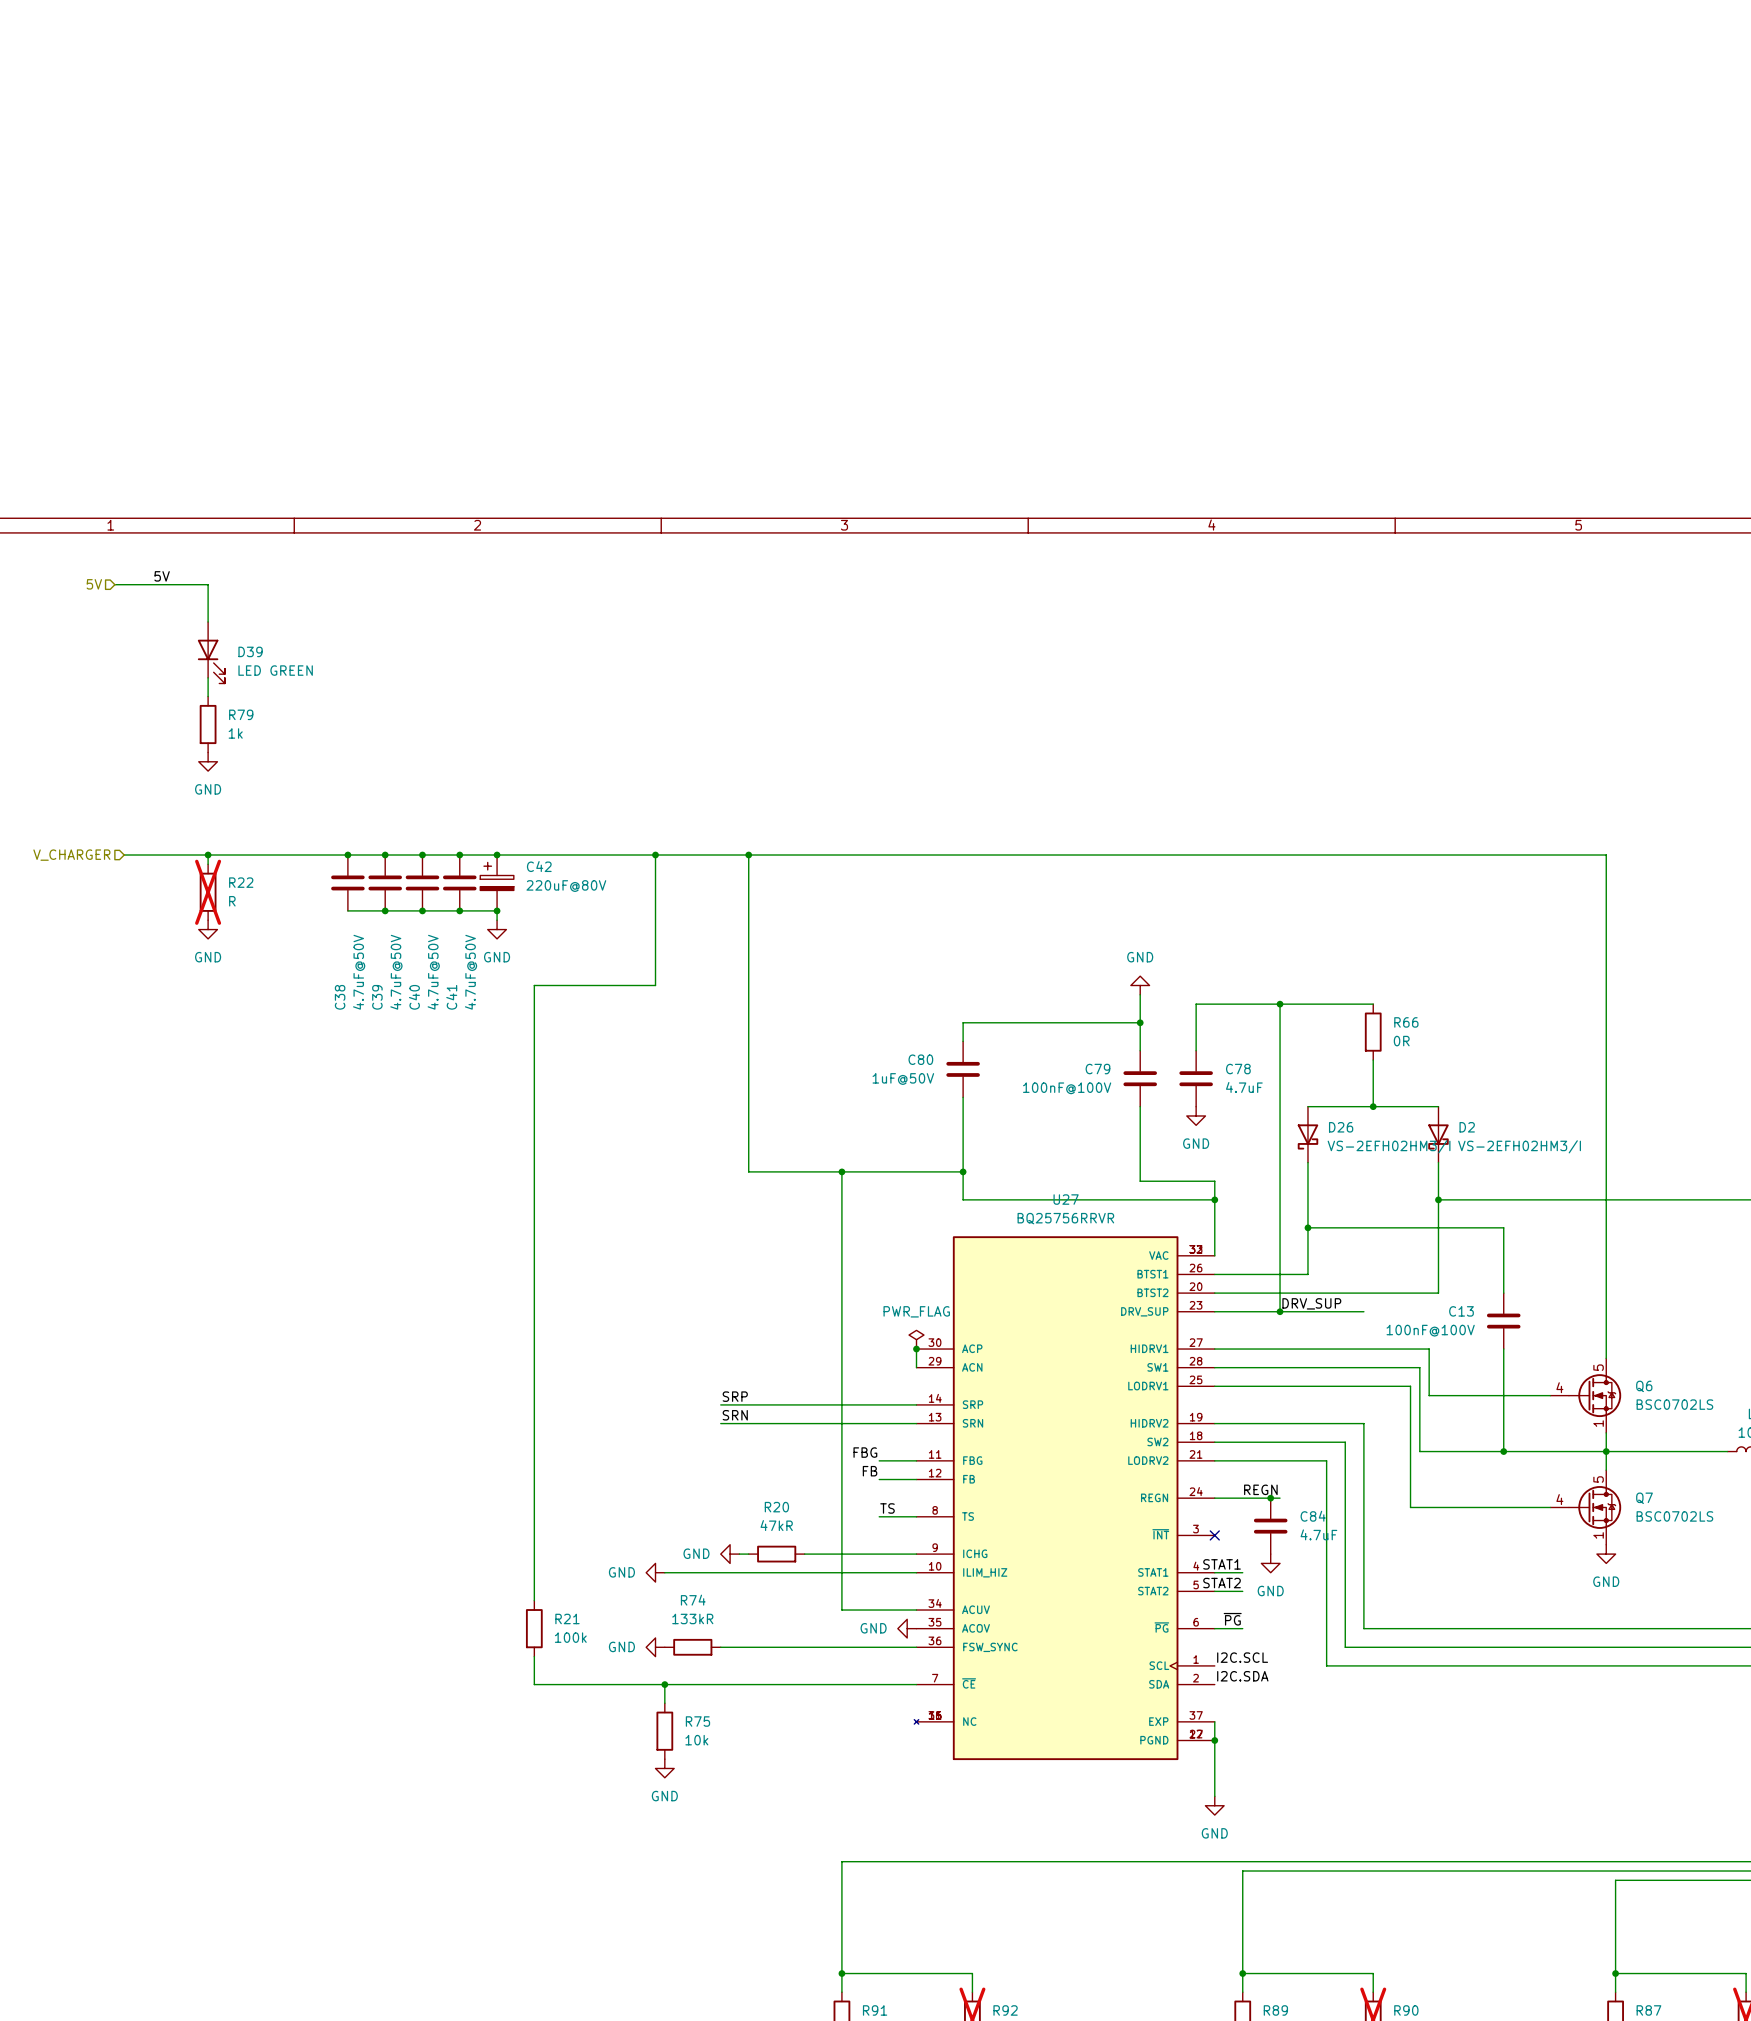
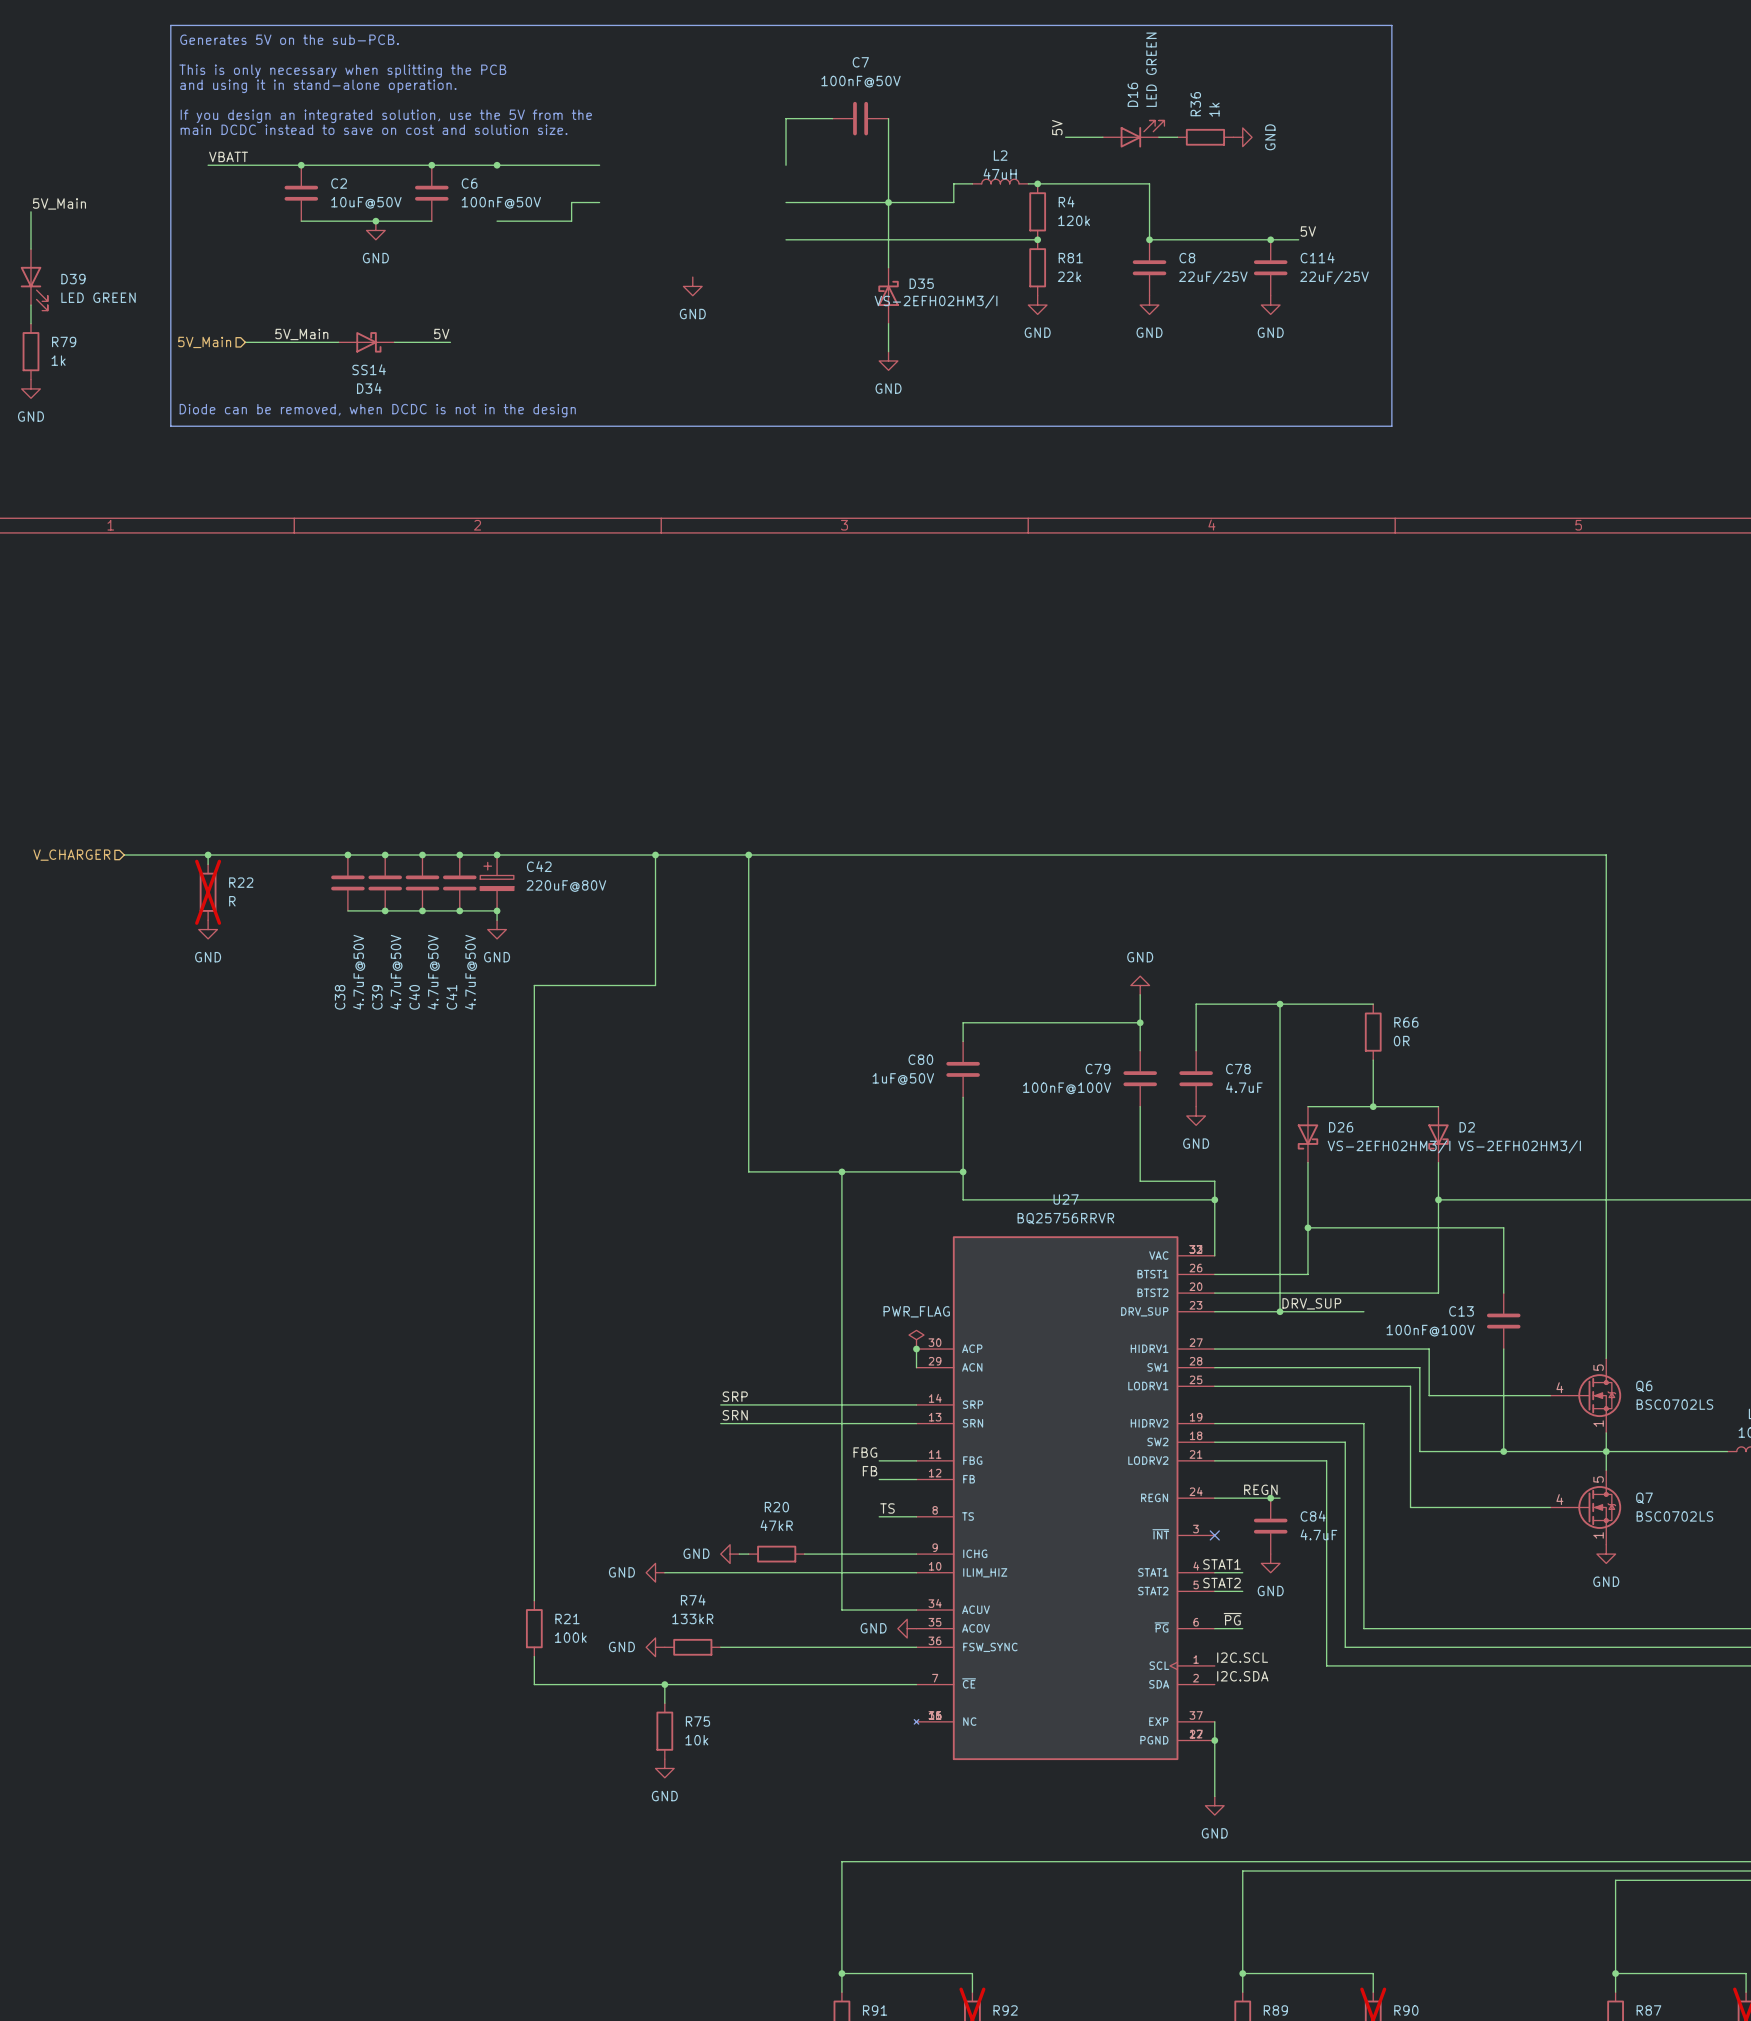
line: none -> (170, 25) (1391, 25) (1391, 426) (170, 426) (170, 25)
text: none -> Generates 5V on the sub-PCB. (289, 39)
text: none -> This is only necessary when splitting the PCB (342, 71)
text: none -> and using it in stand-alone operation. (318, 86)
text: none -> If you design an integrated solution, use the 5V from the (386, 116)
wire: none -> (832, 118) (786, 118) (786, 165)
C7: none -> 100nF@50V (860, 118)
wire: none -> (888, 118) (888, 267)
label: none -> 5V (1057, 127)
text: none -> main DCDC instead to save on cost and solution size. (374, 129)
D16: none -> LED GREEN (1133, 134)
wire: none -> (1065, 137) (1102, 137)
wire: none -> (1158, 137) (1177, 137)
R36: none -> 1k (1205, 137)
power symbol: none -> GND (1242, 137)
label: none -> VBATT (228, 156)
wire: none -> (208, 165) (599, 165)
junction: none -> (301, 165)
junction: none -> (431, 165)
junction: none -> (497, 165)
L2: none -> 47uH (1000, 181)
wire: none -> (972, 183) (953, 183) (953, 202) (786, 202)
wire: none -> (1028, 183) (1149, 183) (1149, 239) (1298, 239)
junction: none -> (1037, 183)
C2: none -> 10uF@50V (301, 193)
C6: none -> 100nF@50V (431, 193)
wire: none -> (599, 202) (571, 202) (571, 221) (497, 221)
junction: none -> (888, 202)
label: none -> 5V_Main (59, 203)
wire: none -> (30, 211) (30, 249)
R4: none -> 120k (1037, 211)
wire: none -> (301, 221) (431, 221)
junction: none -> (375, 221)
power symbol: none -> GND (375, 230)
label: none -> 5V (1308, 231)
wire: none -> (786, 239) (1037, 239)
junction: none -> (1037, 239)
junction: none -> (1149, 239)
junction: none -> (1270, 239)
R81: none -> 22k (1037, 267)
C8: none -> 22uF/25V (1149, 267)
C114: none -> 22uF/25V (1270, 267)
power symbol: none -> GND (692, 286)
D35: none -> VS-2EFH02HM3/I (888, 295)
wire: none -> (30, 305) (30, 323)
power symbol: none -> GND (1037, 305)
power symbol: none -> GND (1149, 305)
power symbol: none -> GND (1270, 305)
wire: none -> (888, 323) (888, 351)
label: none -> 5V_Main (301, 334)
label: none -> 5V (441, 334)
hierarchical label: none -> 5V_Main (204, 342)
wire: none -> (245, 342) (338, 342)
D34: none -> SS14 (366, 342)
wire: none -> (394, 342) (450, 342)
power symbol: none -> GND (888, 360)
power symbol: none -> GND (30, 388)
text: none -> Diode can be removed, when DCDC is not in the design (377, 410)
label: 5V (162, 576) -> none
hierarchical label: 5V (94, 584) -> none
wire: (114, 584) (208, 584) (208, 621) -> none
D39 position: (211, 652) -> (34, 279)
wire: (208, 677) (208, 696) -> none
R79 position: (208, 724) -> (30, 351)
power symbol: GND (208, 761) -> none

